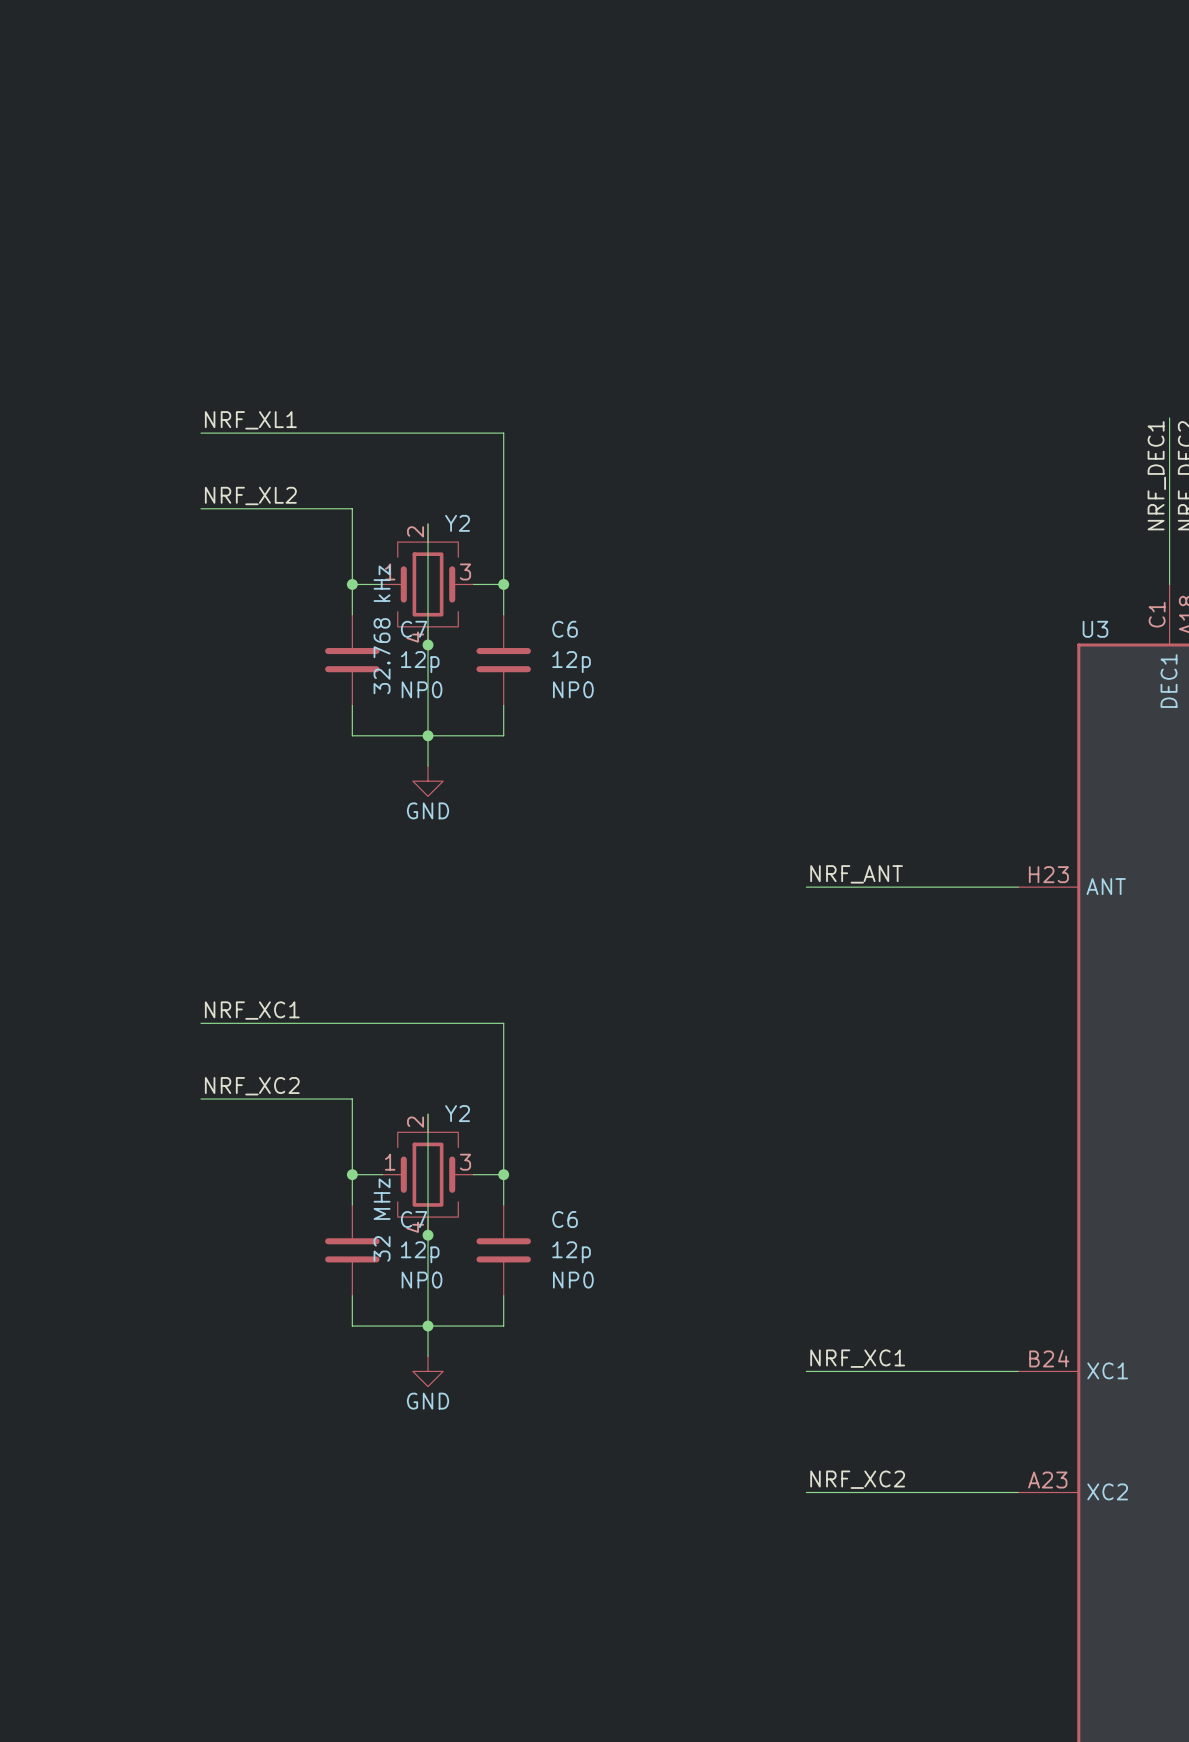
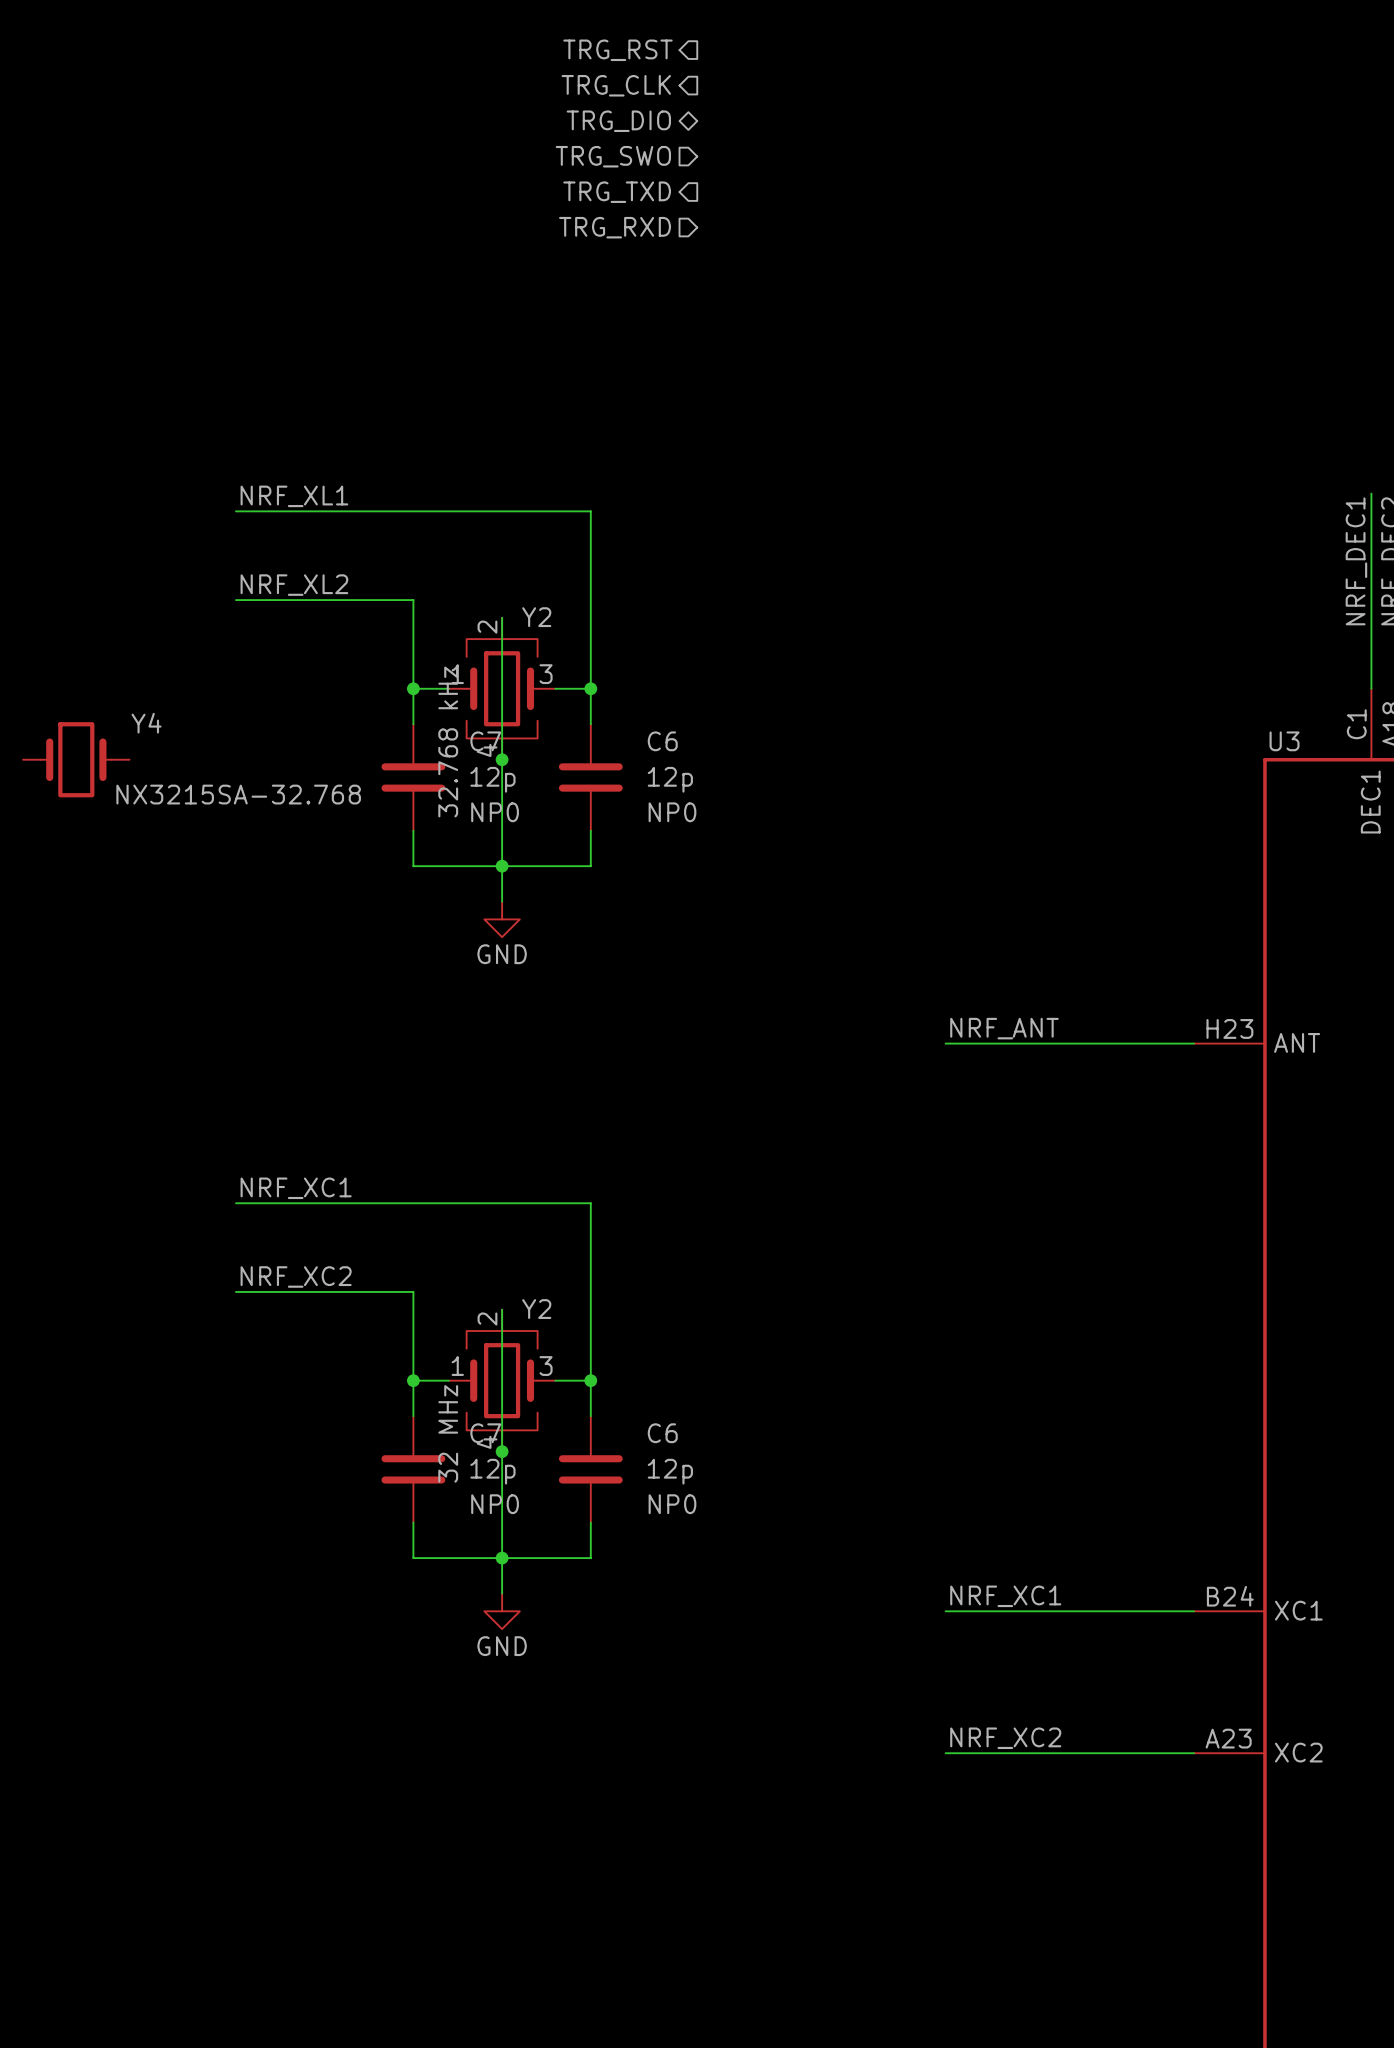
hierarchical label: none -> TRG_RST (617, 50)
hierarchical label: none -> TRG_CLK (616, 85)
hierarchical label: none -> TRG_DIO (618, 121)
hierarchical label: none -> TRG_SWO (613, 156)
hierarchical label: none -> TRG_TXD (617, 192)
hierarchical label: none -> TRG_RXD (615, 227)
Y4: none -> NX3215SA-32.768 (76, 759)

